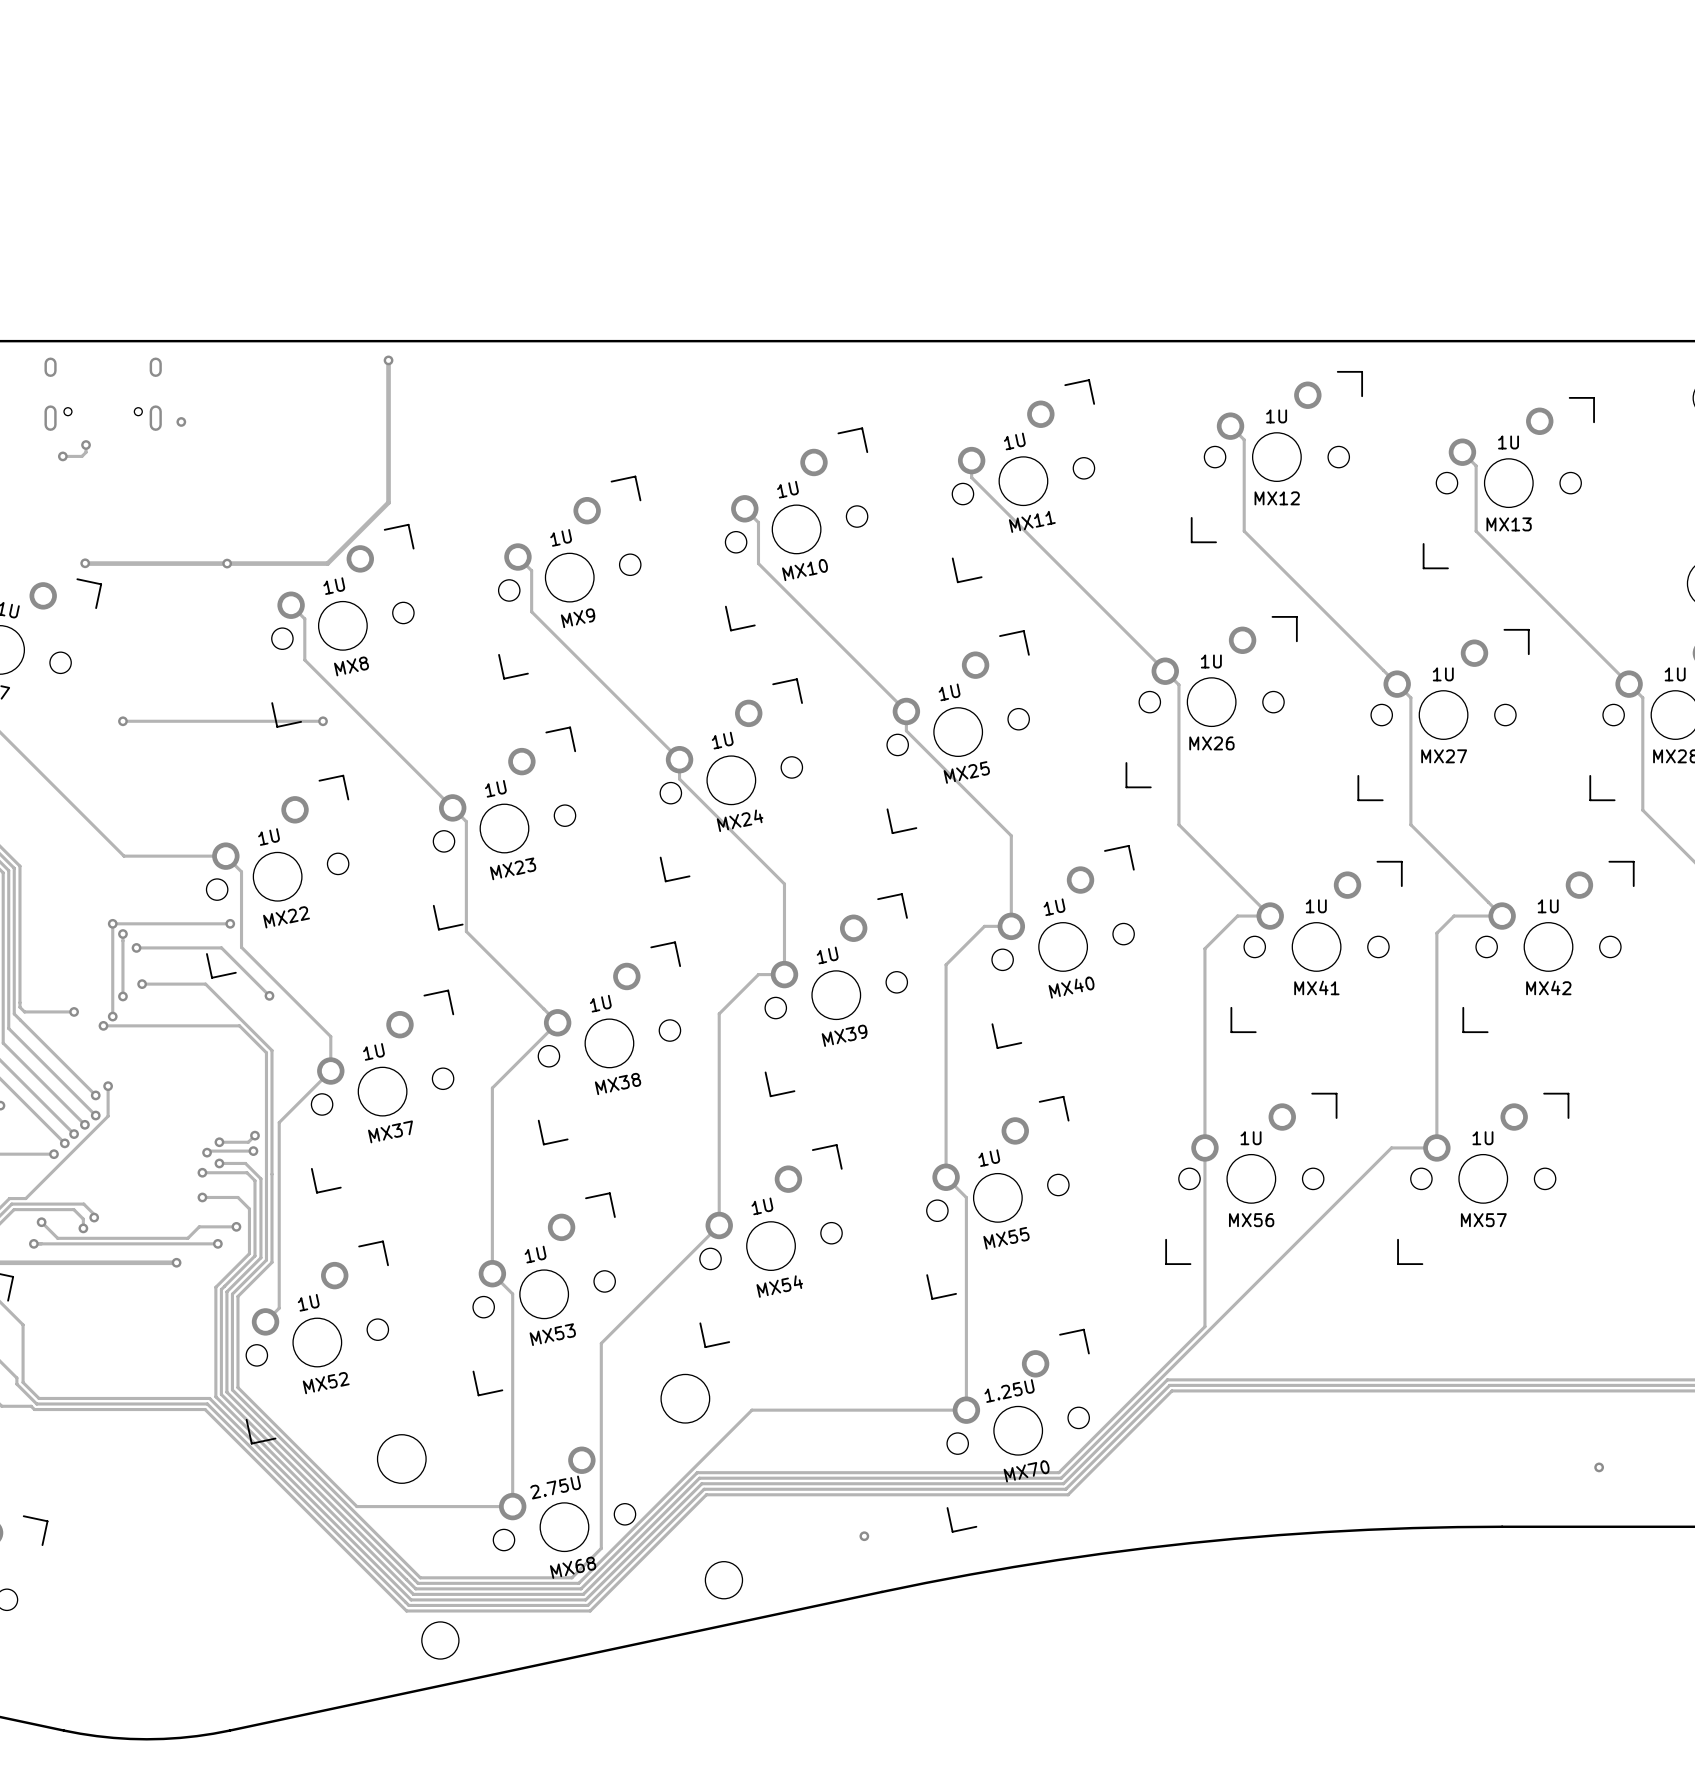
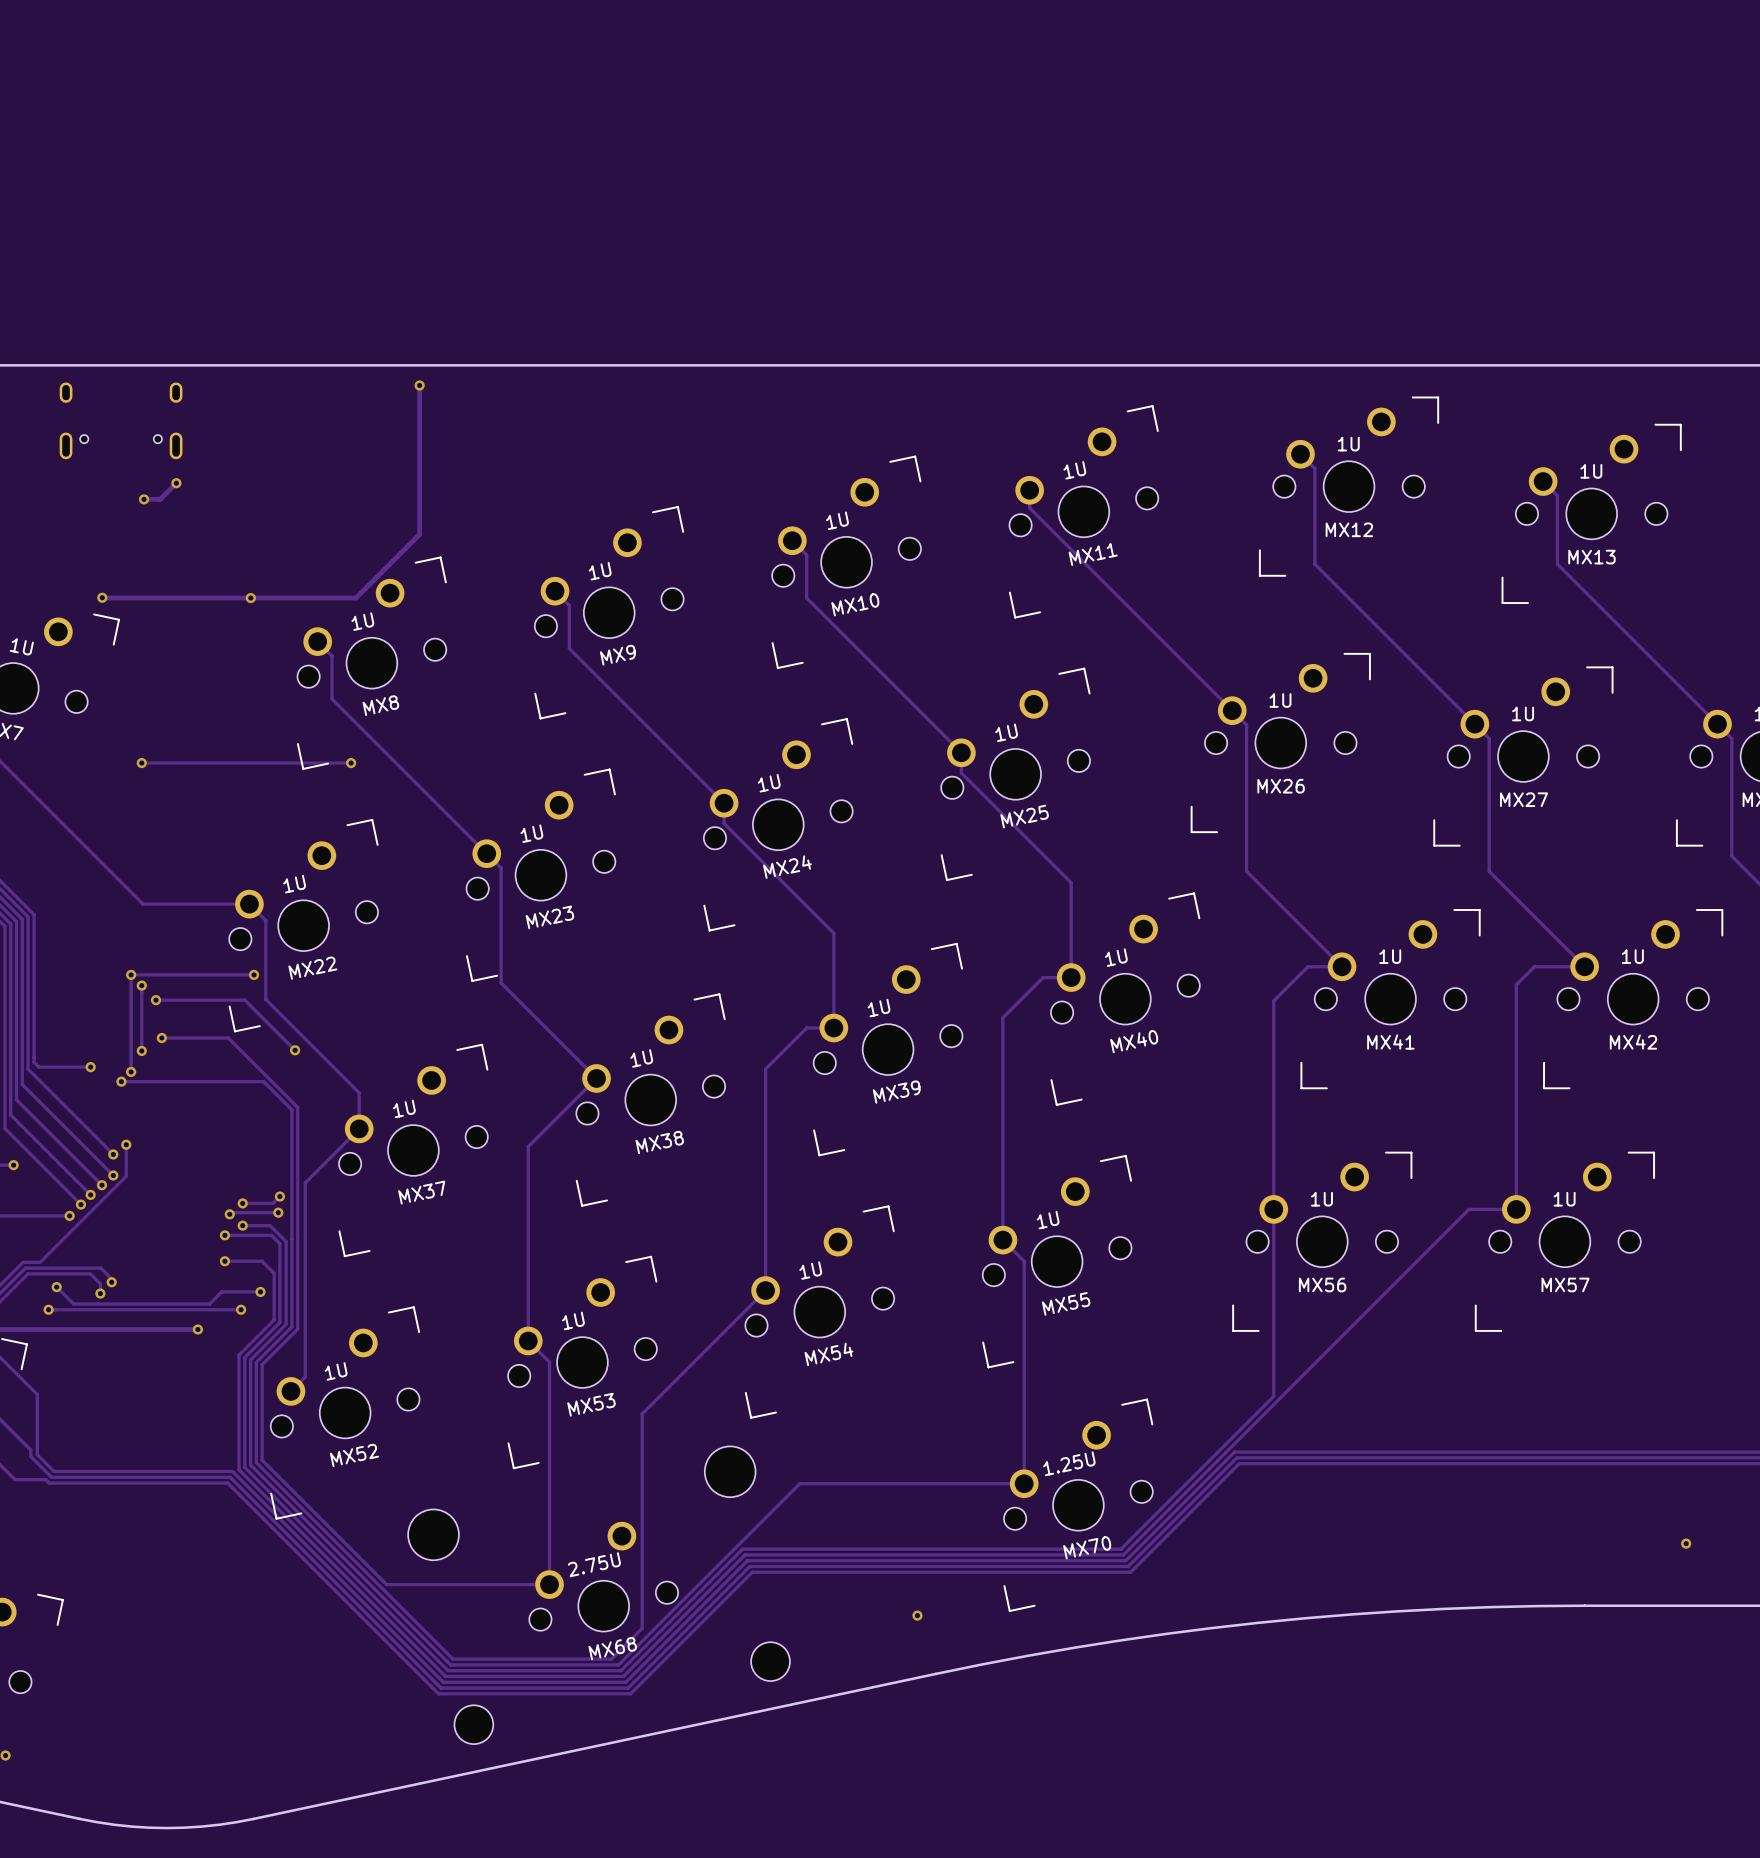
via: (181, 421) -> none
track: (86, 445) (86, 452) (81, 456) (62, 456) -> none
via: (86, 445) -> none
track: none -> (176, 483) (160, 499) (144, 499)
via: none -> (176, 483)
via: (62, 456) -> none
via: none -> (144, 499)

